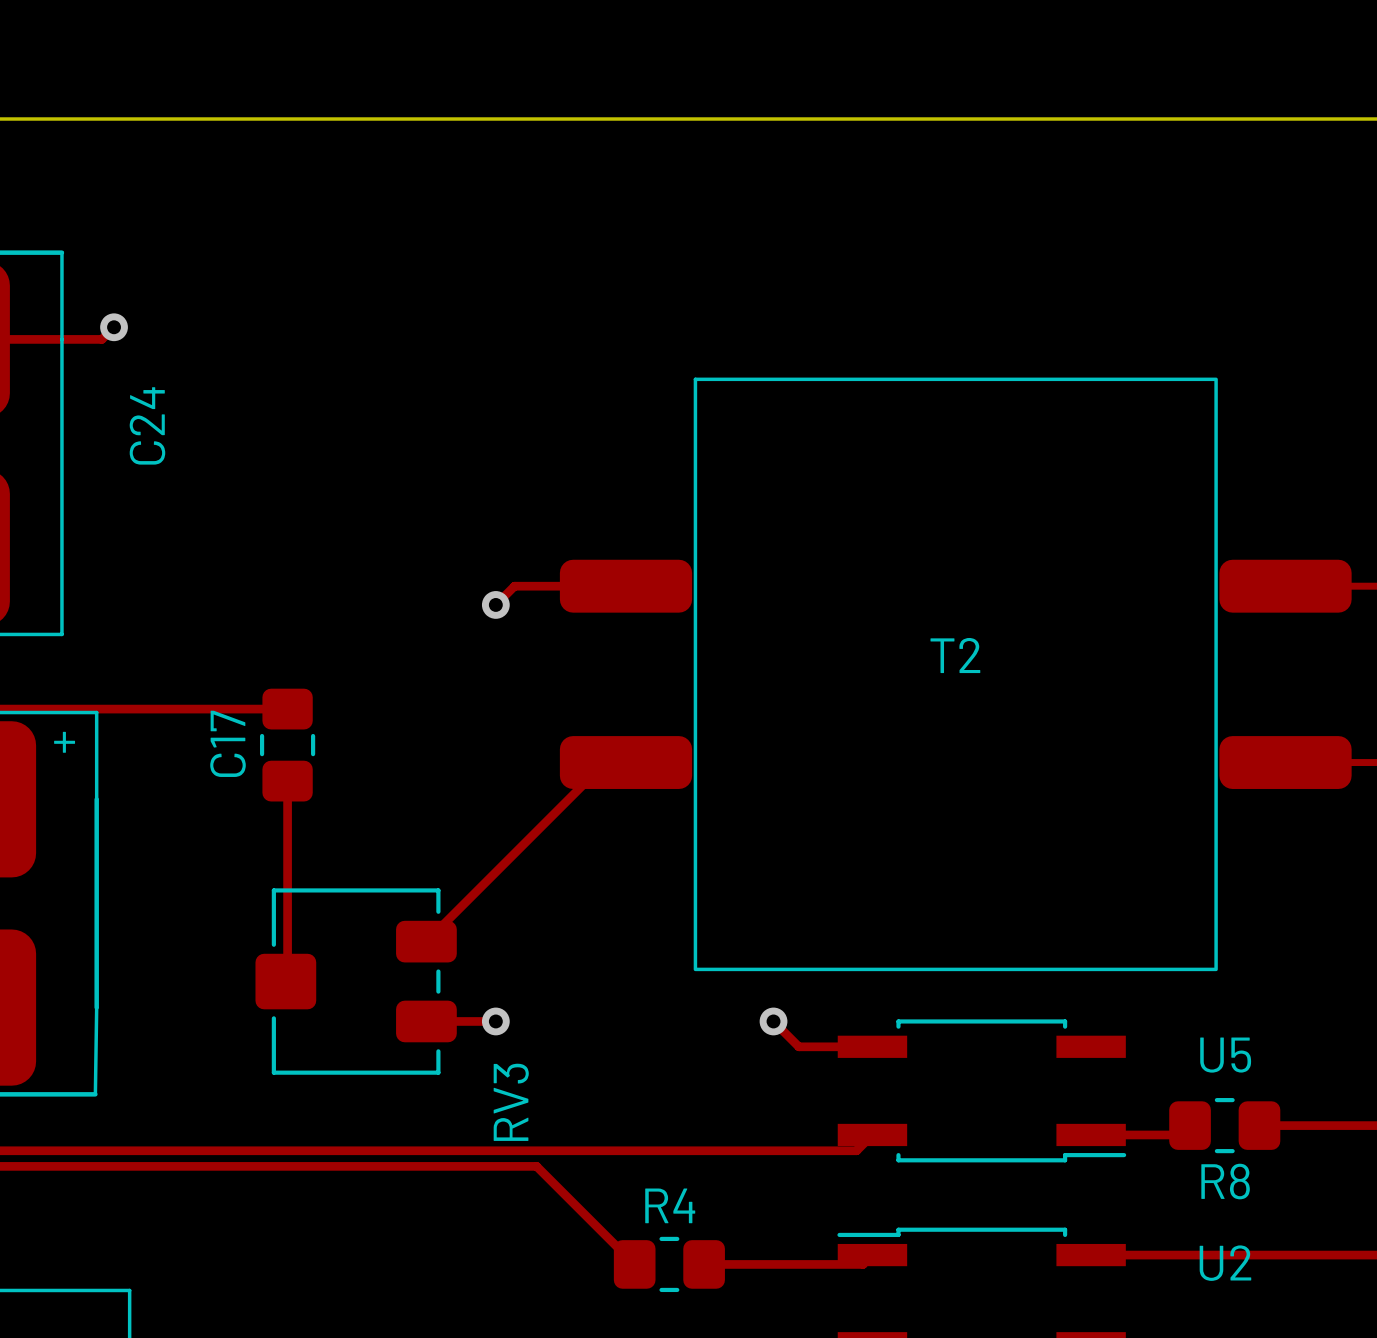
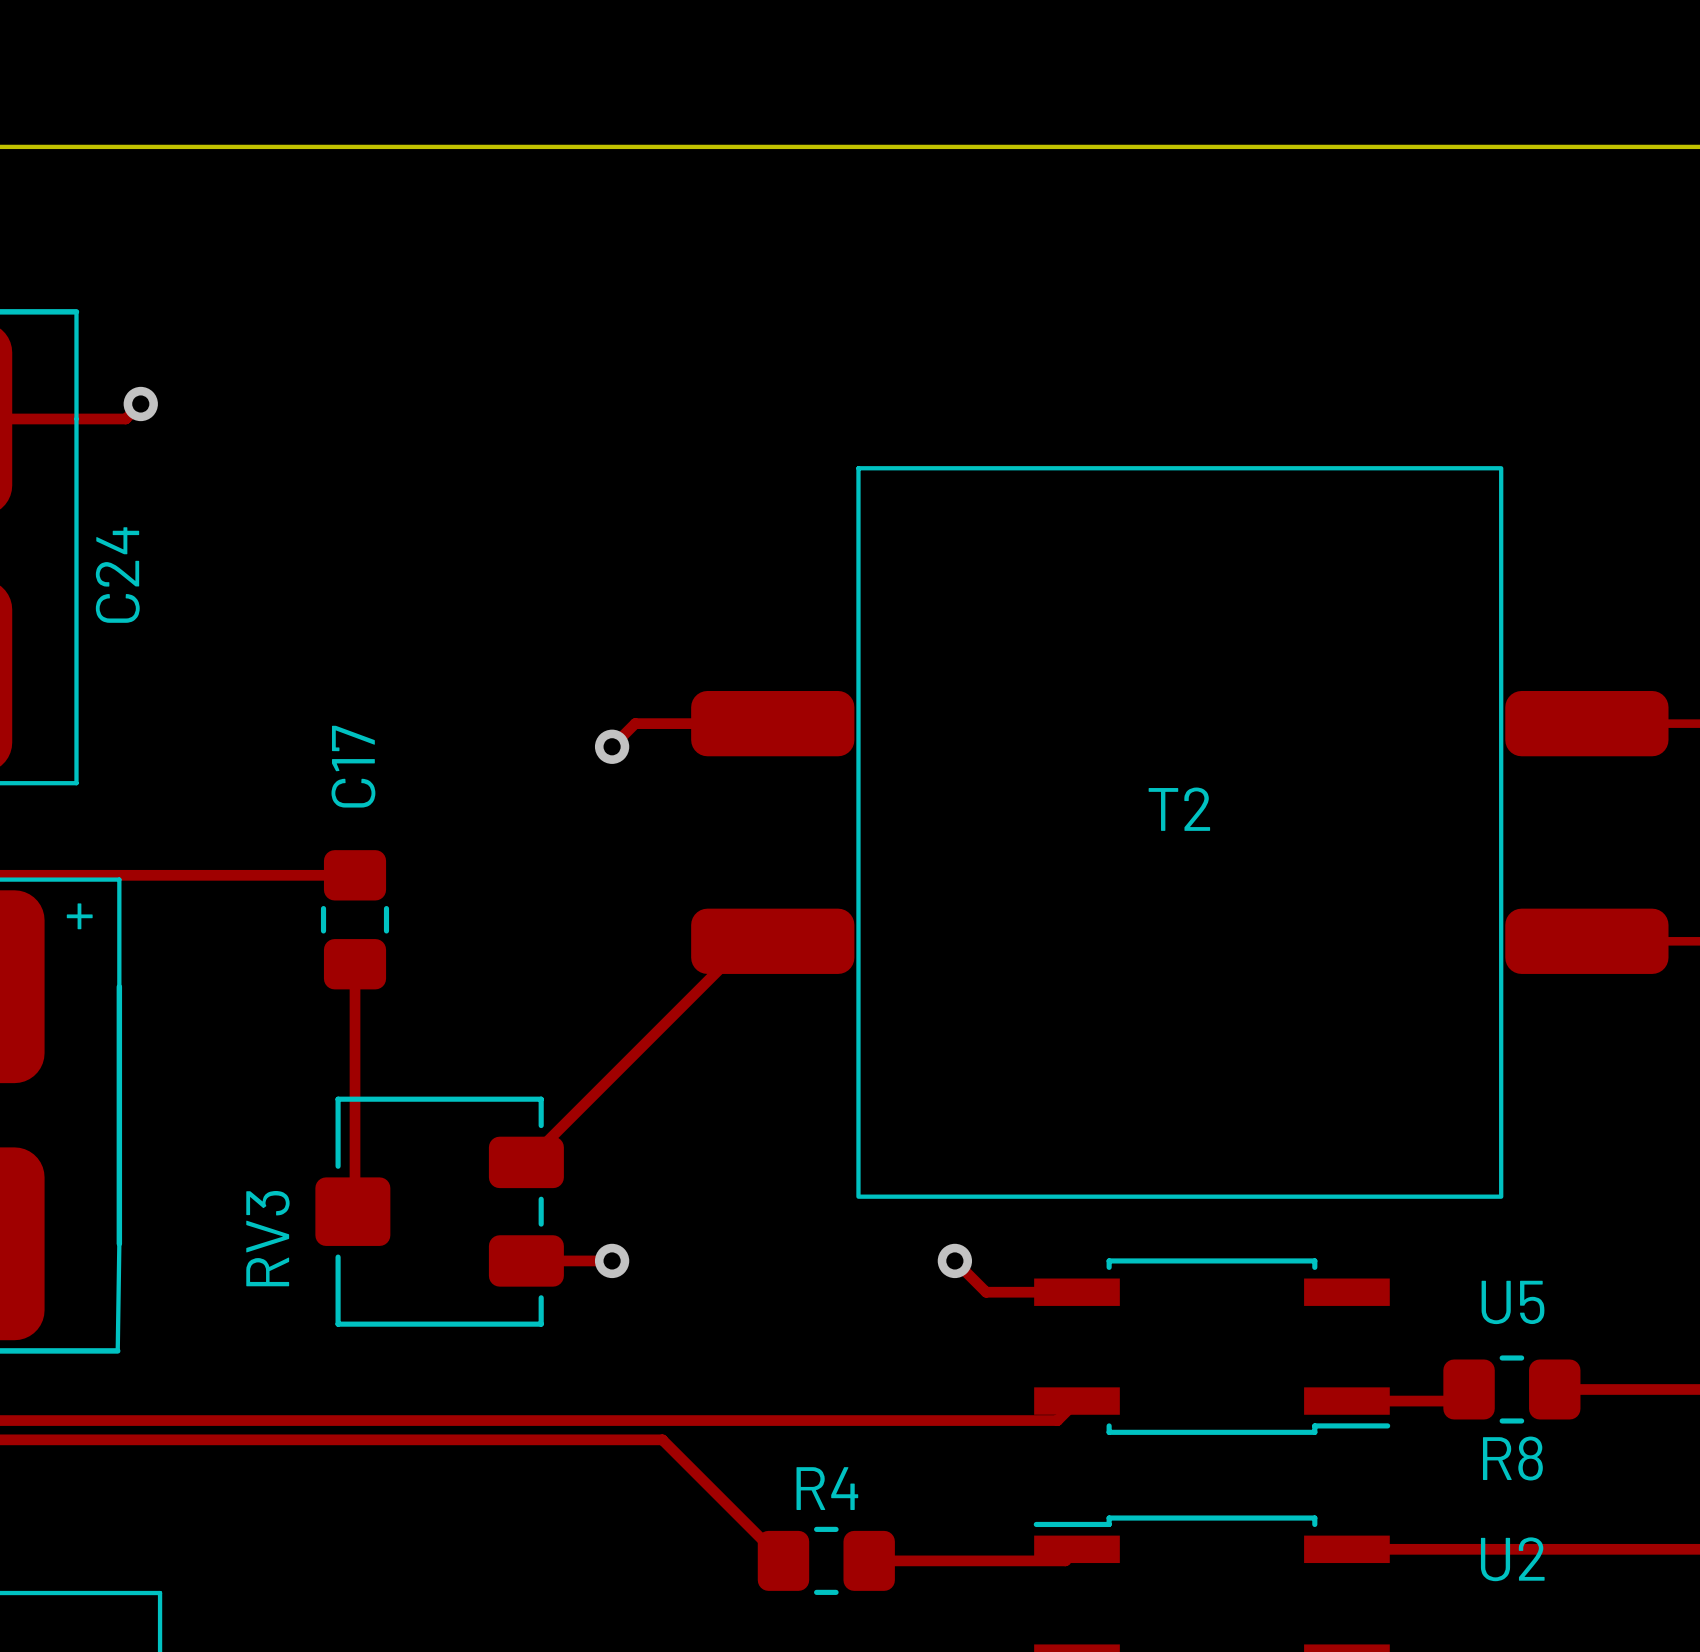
C24 name position: C24 (147, 425) -> C24 (117, 575)
C17 name position: C17 (228, 743) -> C17 (353, 766)
RV3 name position: RV3 (511, 1102) -> RV3 (267, 1238)

